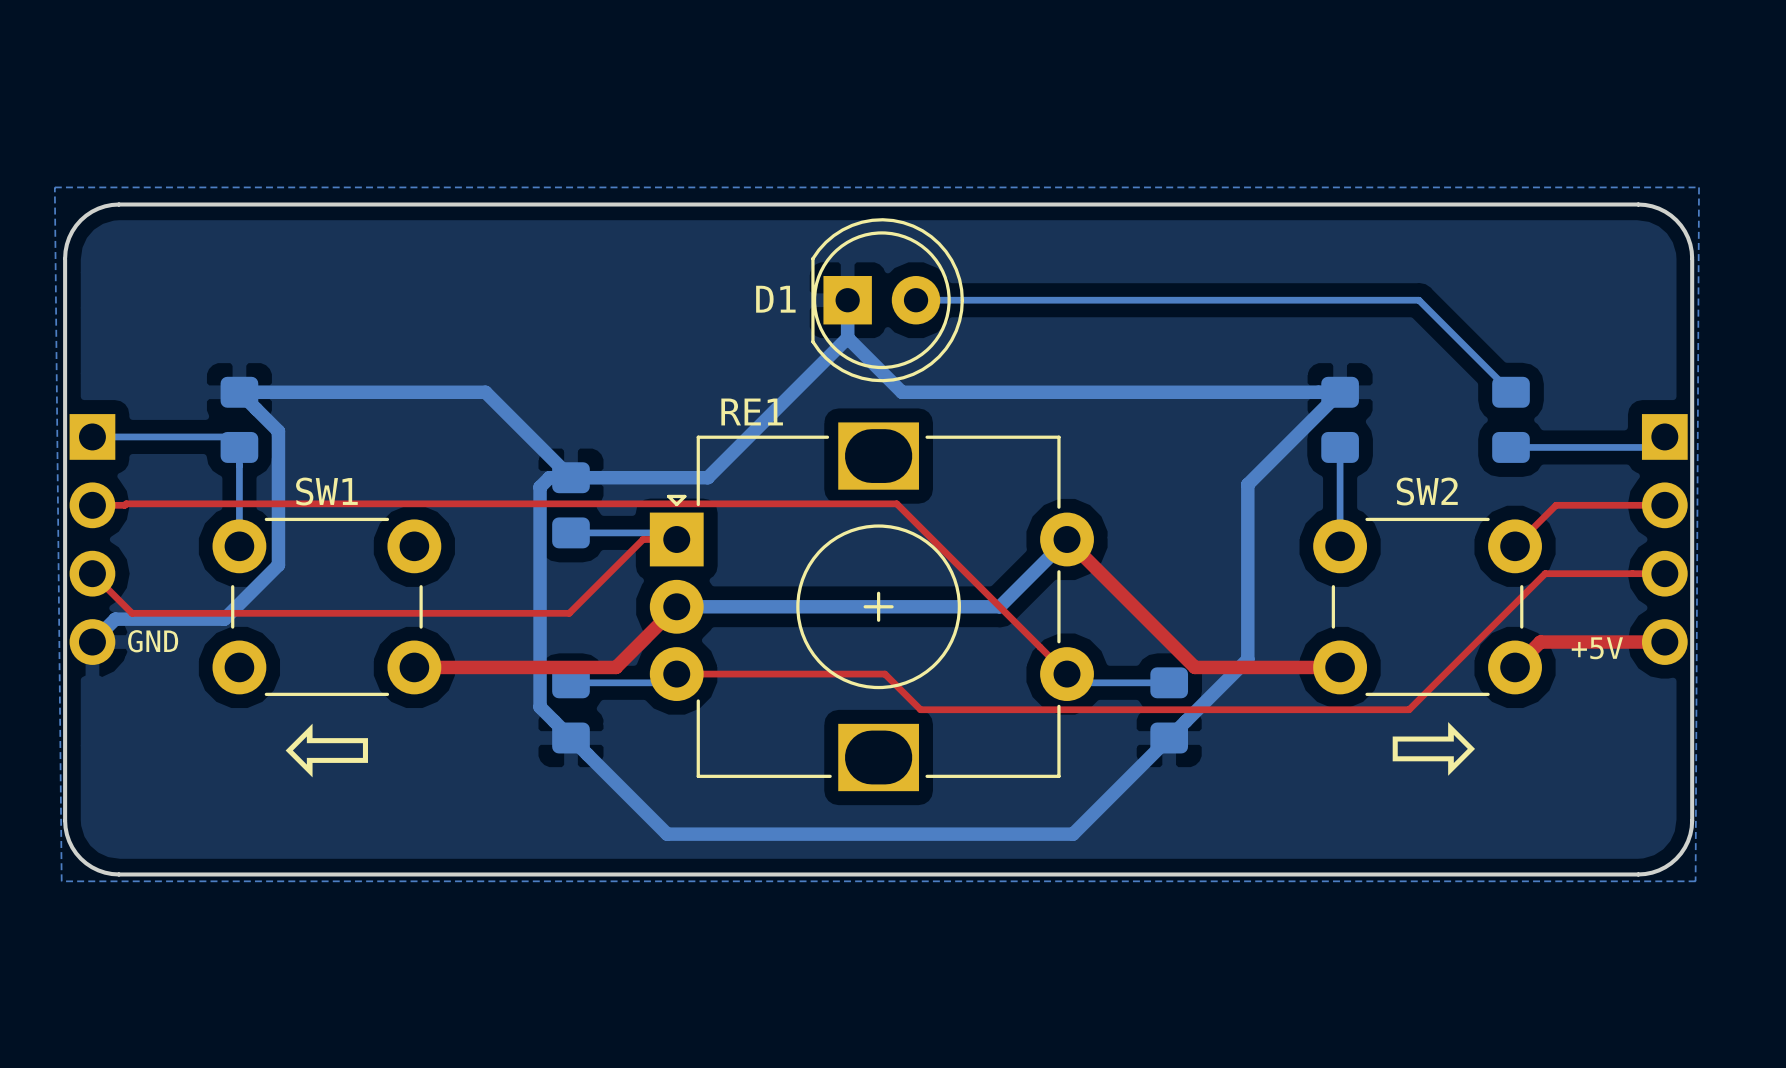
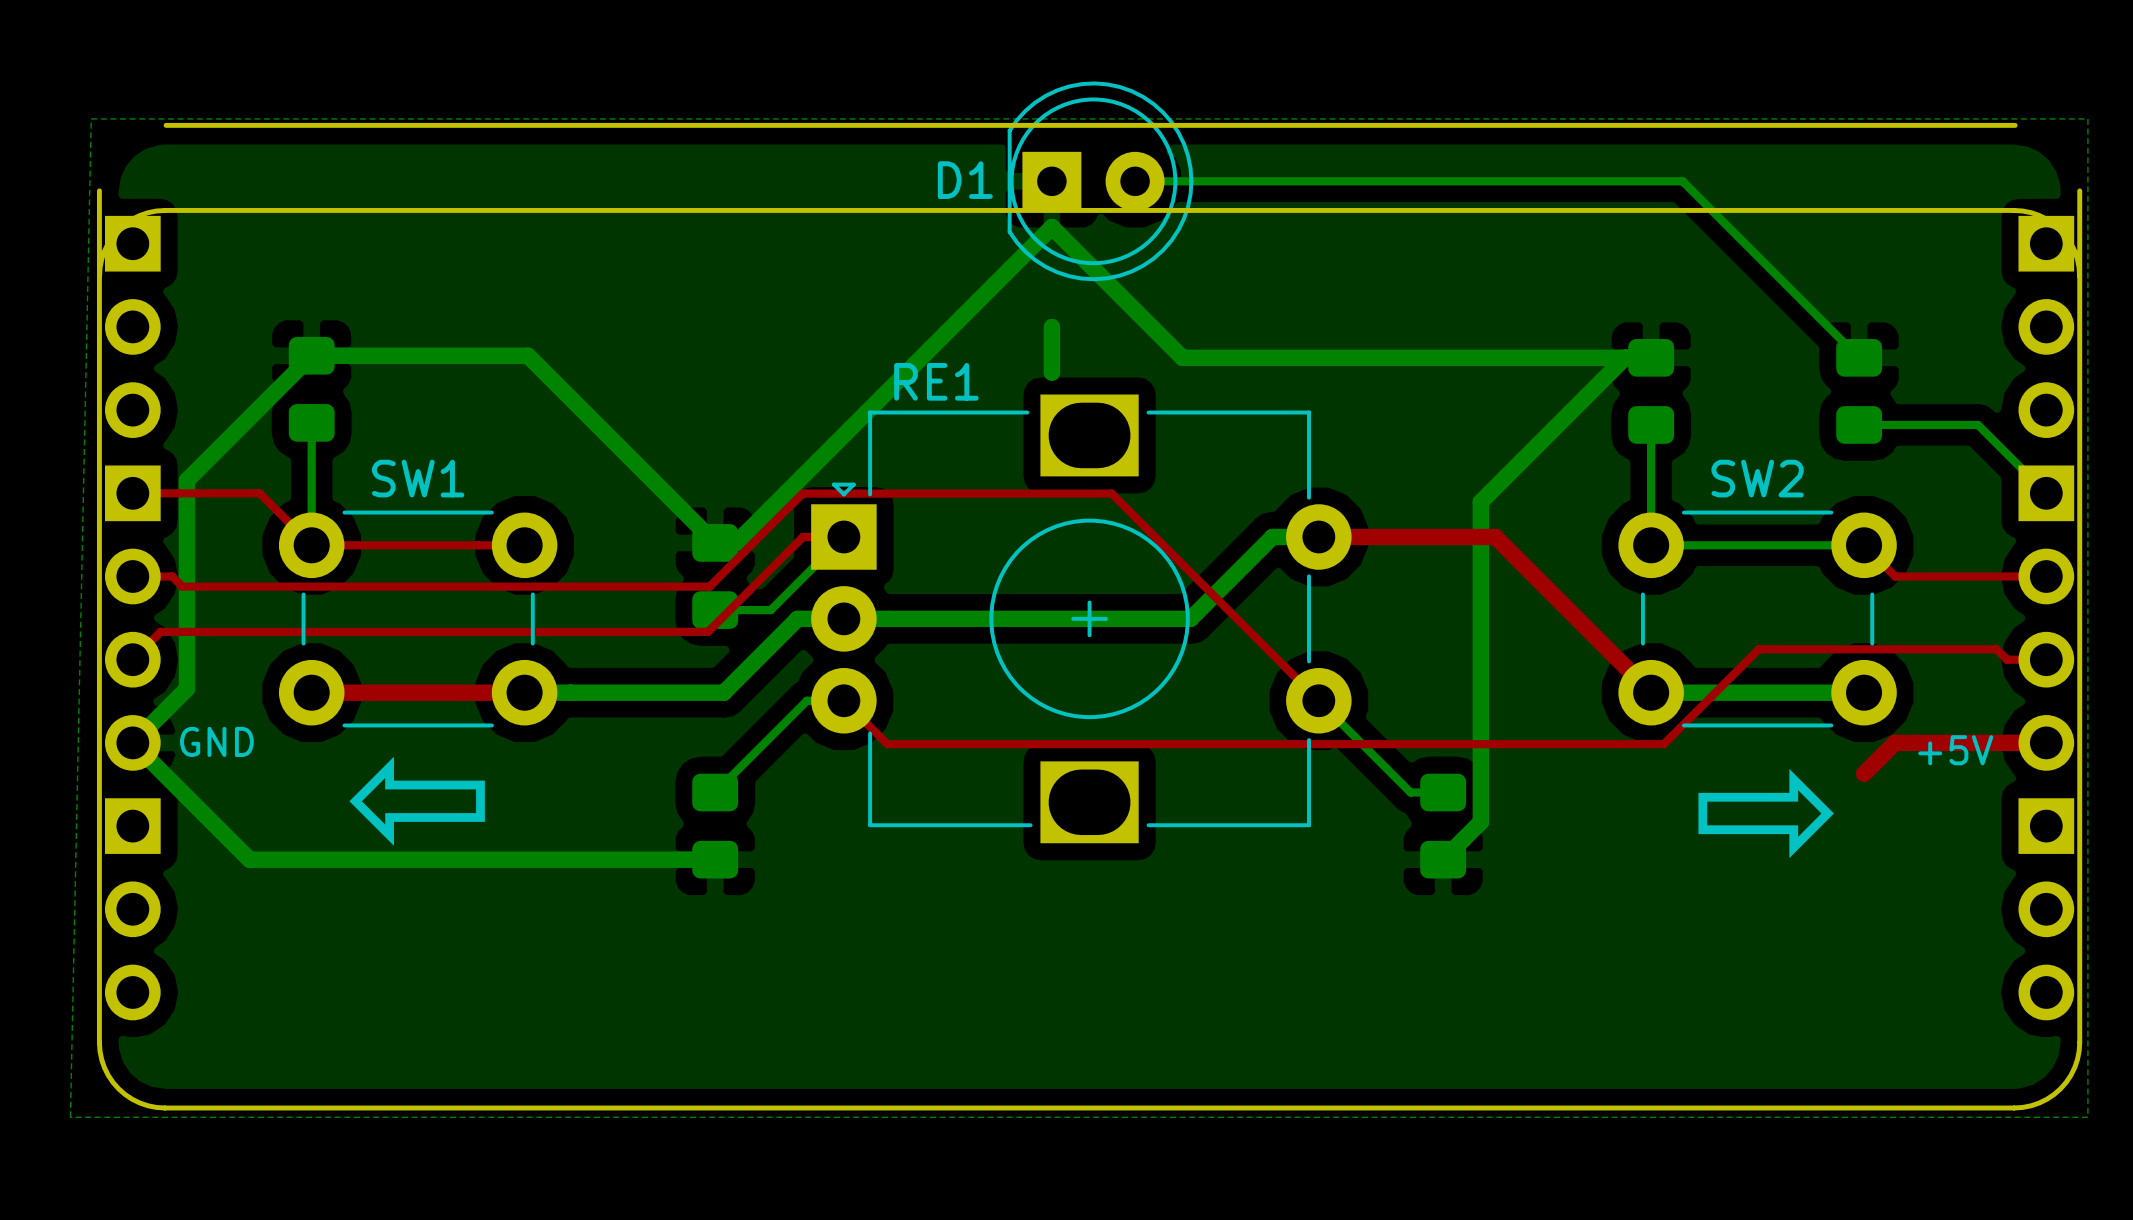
board edge: none -> (166, 125) (2015, 125)
bottom track: none -> (1135, 181) (1682, 181) (1859, 357)
bottom zone outline: (54, 187) (1699, 187) (1695, 881) (61, 881) (54, 187) -> (91, 118) (70, 1117) (2087, 1117) (2087, 118) (91, 118)
D1 footprint: [811, 218, 964, 383] -> [1007, 81, 1194, 282]
part: none -> (132, 326)
bottom track: (916, 300) (1418, 300) (1511, 392) -> none
part: none -> (2046, 326)
bottom track: none -> (1624, 357) (1480, 501) (1480, 822)
bottom track: none -> (1651, 424) (1651, 506)
bottom track: (485, 392) (239, 392) (278, 431) (278, 565) (224, 619) (115, 619) -> (611, 438) (528, 355) (311, 355) (186, 480) (186, 688) (160, 715)
part position: (239, 419) -> (311, 389)
part position: (1340, 419) -> (1651, 391)
part position: (1511, 419) -> (1859, 391)
bottom track: (92, 436) (228, 436) (239, 447) -> (311, 422) (311, 506)
top track: none -> (132, 493) (259, 493) (311, 545) (524, 545)
bottom track: (1664, 436) (1654, 447) (1511, 447) -> (2046, 493) (1977, 424) (1859, 424)
bottom track: none -> (1318, 536) (1272, 536) (1190, 618) (797, 618) (723, 692) (524, 692)
top track: none -> (1318, 536) (1495, 536) (1651, 692)
bottom track: (571, 477) (549, 477) (540, 487) (540, 707) (667, 834) (1073, 834) (1169, 737) -> none
bottom track: (588, 477) (707, 477) (847, 337) (902, 392) (1340, 392) (1247, 484) (1247, 659) (1200, 707) -> (736, 542) (1051, 227) (1182, 357) (1651, 357)
bottom track: (239, 479) (239, 546) -> none
bottom track: (1340, 479) (1340, 546) -> (1651, 545) (1864, 545)
top track: (124, 505) (896, 503) (1067, 674) -> (172, 576) (182, 586) (709, 586) (802, 493) (1111, 493) (1318, 700)
top track: (1556, 505) (1515, 546) -> (1913, 576) (1895, 576) (1864, 545)
bottom track: (616, 532) (670, 532) (676, 539) -> (770, 610) (843, 536)
top track: (676, 539) (643, 539) (569, 613) (132, 613) (92, 573) -> (843, 536) (802, 536) (708, 631) (160, 631) (132, 659)
bottom track: (1067, 539) (999, 606) (676, 606) -> none
top track: (1067, 539) (1194, 667) (1340, 667) -> none
top track: (1632, 573) (1545, 573) (1409, 709) (920, 709) (884, 674) (676, 674) -> (2006, 659) (1996, 649) (1758, 649) (1663, 744) (887, 744) (843, 700)
top track: none -> (311, 692) (524, 692)
bottom track: none -> (1651, 692) (1864, 692)
SW1 position: (326, 606) -> (418, 619)
top track: (676, 606) (616, 667) (414, 667) -> none
RE1 position: (871, 606) -> (1081, 618)
SW2 position: (1427, 606) -> (1757, 619)
bottom track: none -> (132, 742) (249, 859) (715, 859)
bottom track: (676, 674) (668, 682) (571, 682) -> (843, 700) (806, 700) (715, 792)
bottom track: (1067, 674) (1075, 682) (1142, 682) -> (1318, 700) (1410, 792)
text position: ⇦ (1433, 748) -> ⇦ (1766, 813)
text position: ⇦ (326, 750) -> ⇦ (417, 801)
part: none -> (132, 909)
part: none -> (2046, 909)
board edge: (65, 820) (69, 841) (80, 858) (98, 870) (118, 874) (1638, 874) (1658, 870) (1676, 858) (1688, 841) (1692, 820) -> (99, 960) (99, 1042) (104, 1067) (112, 1082) (132, 1099) (147, 1105) (164, 1108) (2022, 1107) (2039, 1103) (2054, 1094) (2066, 1082) (2074, 1067) (2079, 1042) (2079, 960)

